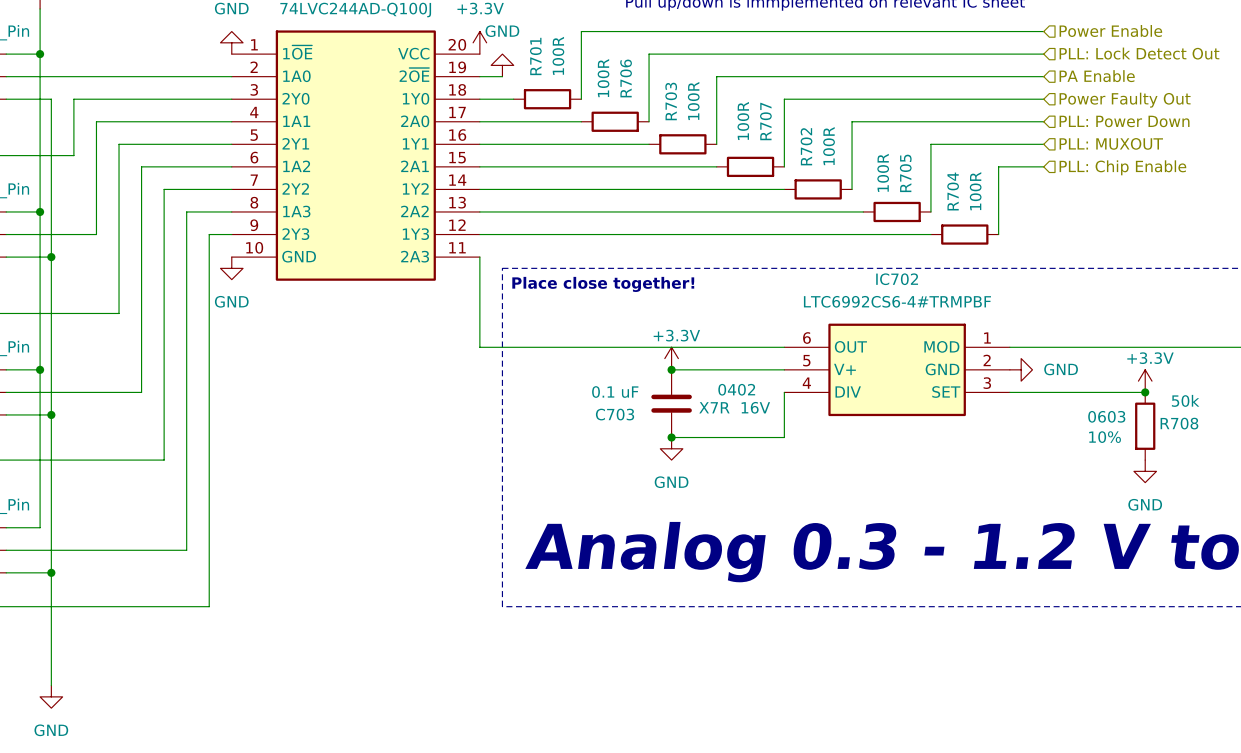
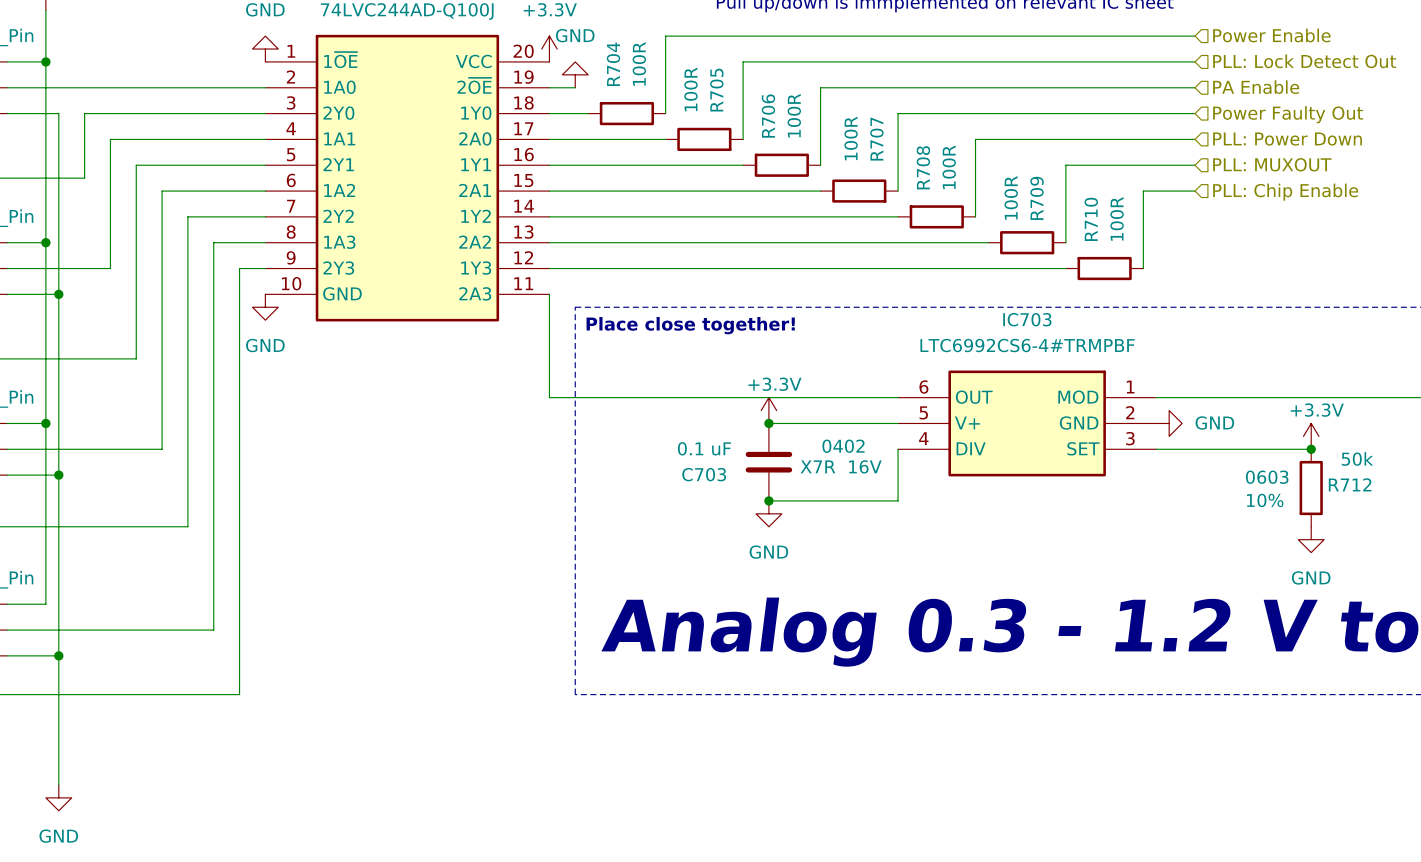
R701 name: R701 (535, 56) -> R704 (613, 64)
R706 name: R706 (626, 78) -> R705 (716, 90)
R703 name: R703 (671, 101) -> R706 (768, 116)
R702 name: R702 (806, 146) -> R708 (923, 167)
R705 name: R705 (905, 173) -> R709 (1037, 198)
R704 name: R704 (953, 191) -> R710 (1091, 219)
IC702 name: IC702 (897, 279) -> IC703 (1027, 319)
R708 name: R708 (1179, 423) -> R712 (1350, 484)

